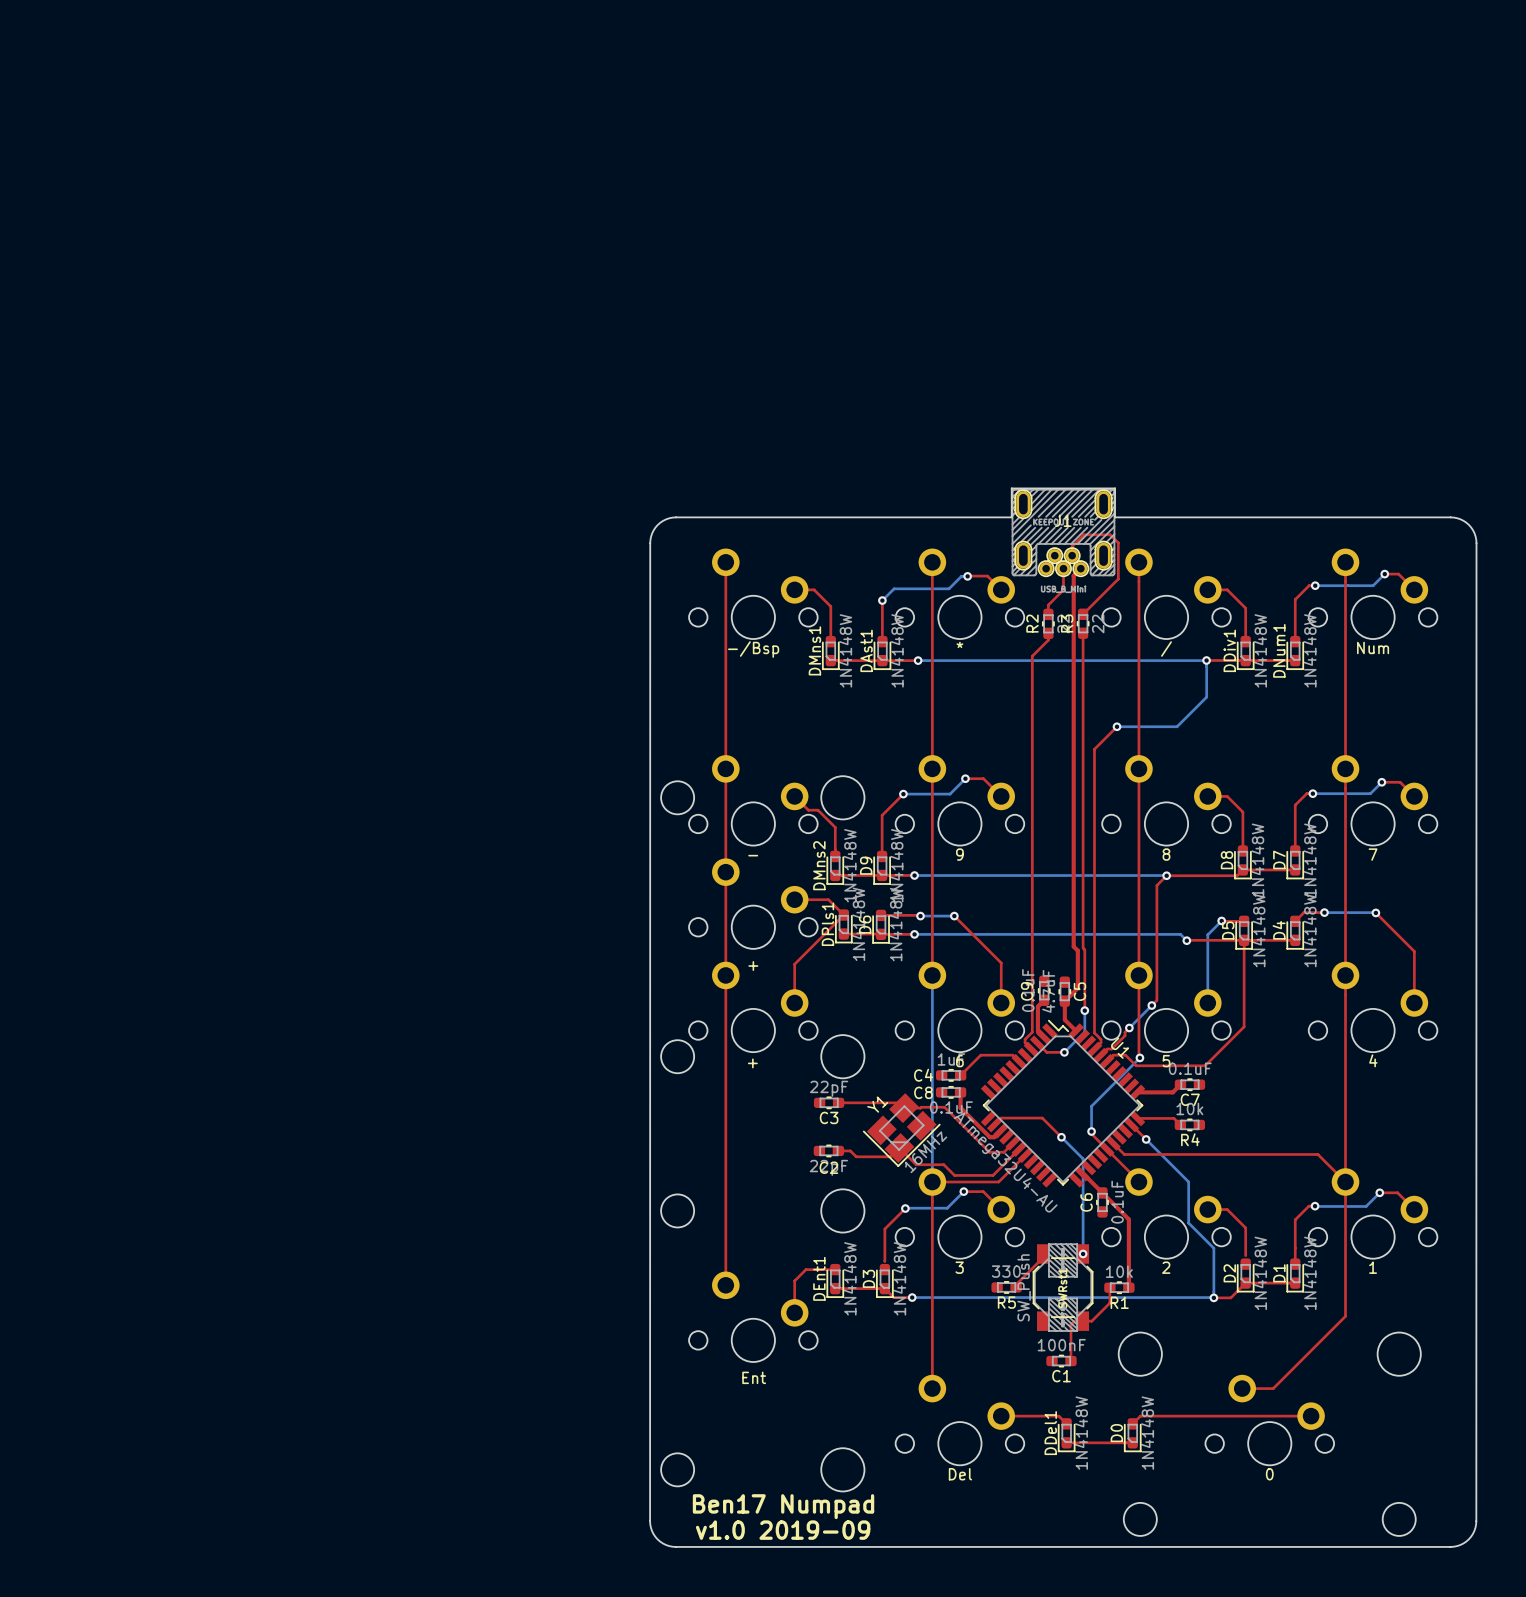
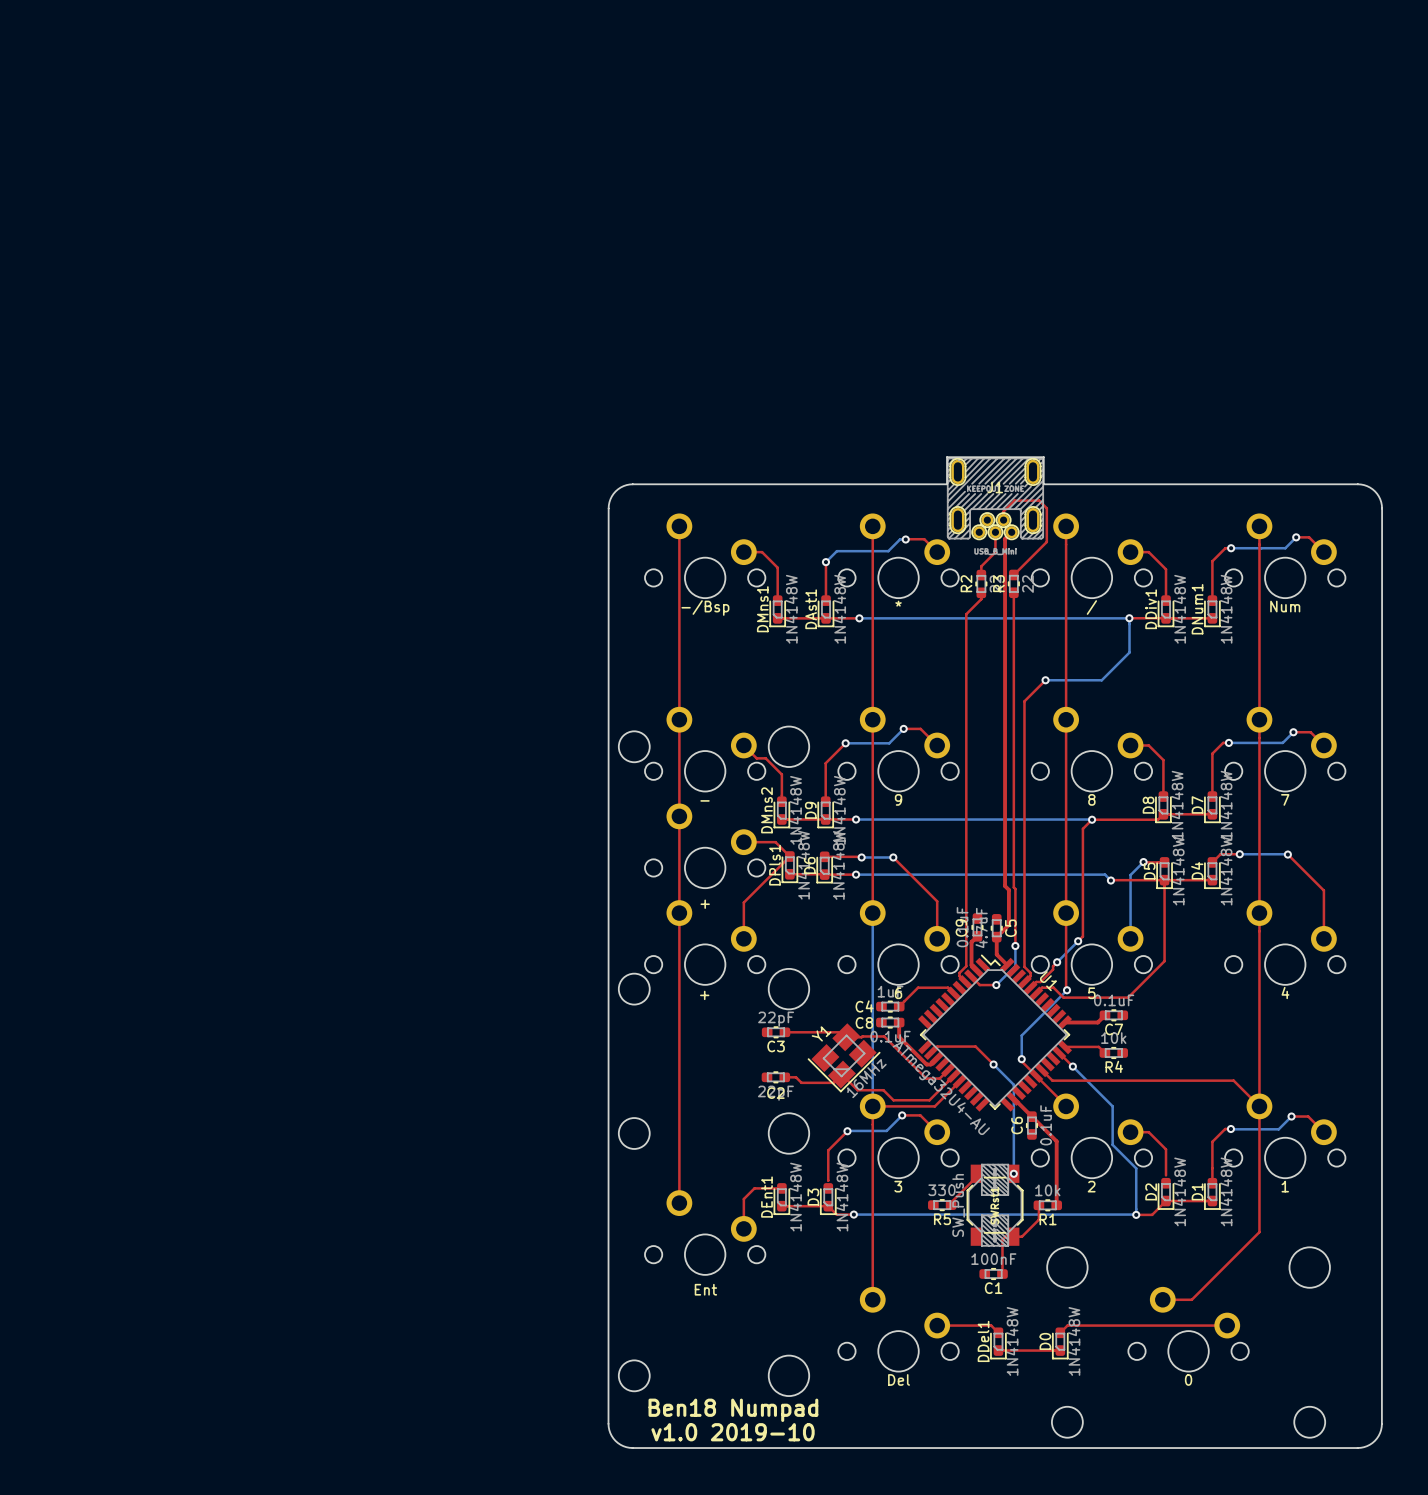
text: Ben17 Numpad (783, 1506) -> Ben18 Numpad (733, 1410)
text: v1.0 2019-09 (783, 1530) -> v1.0 2019-10 (733, 1432)

